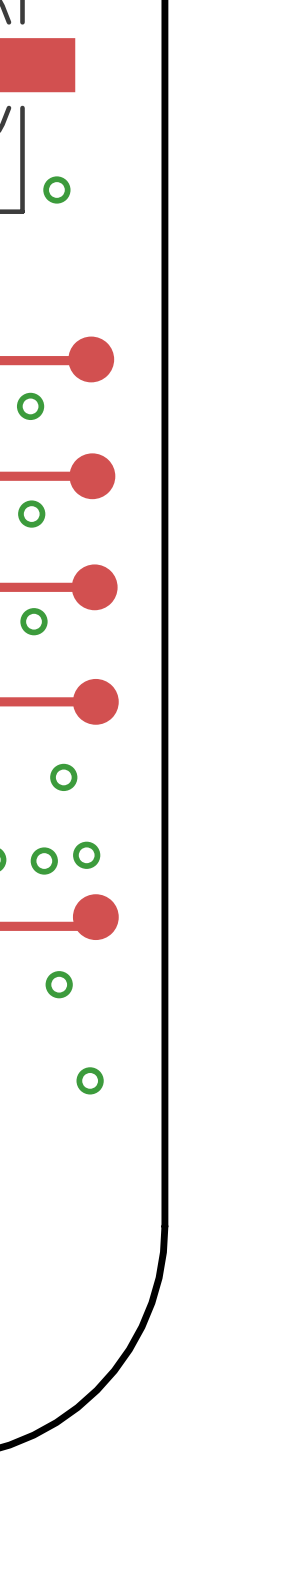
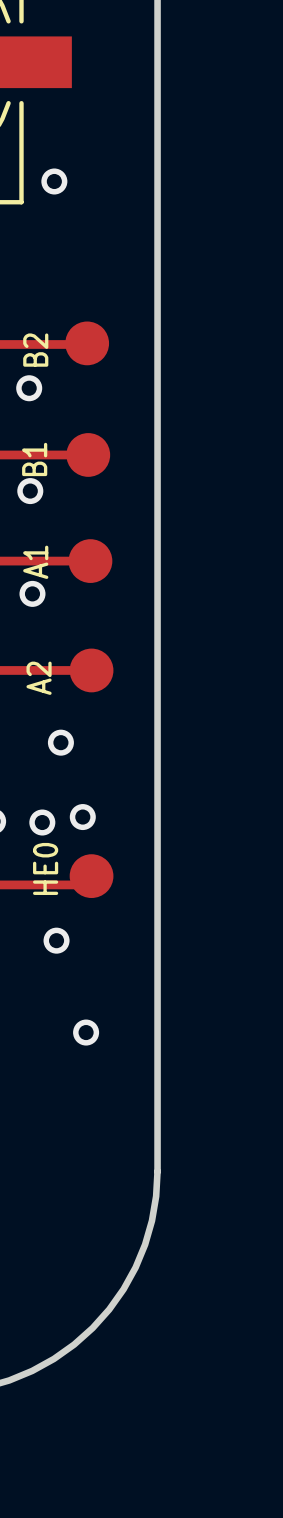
text: none -> B2 (35, 350)
text: none -> B1 (34, 459)
text: none -> A1 (35, 562)
text: none -> A2 (39, 678)
text: none -> HE0 (45, 868)

